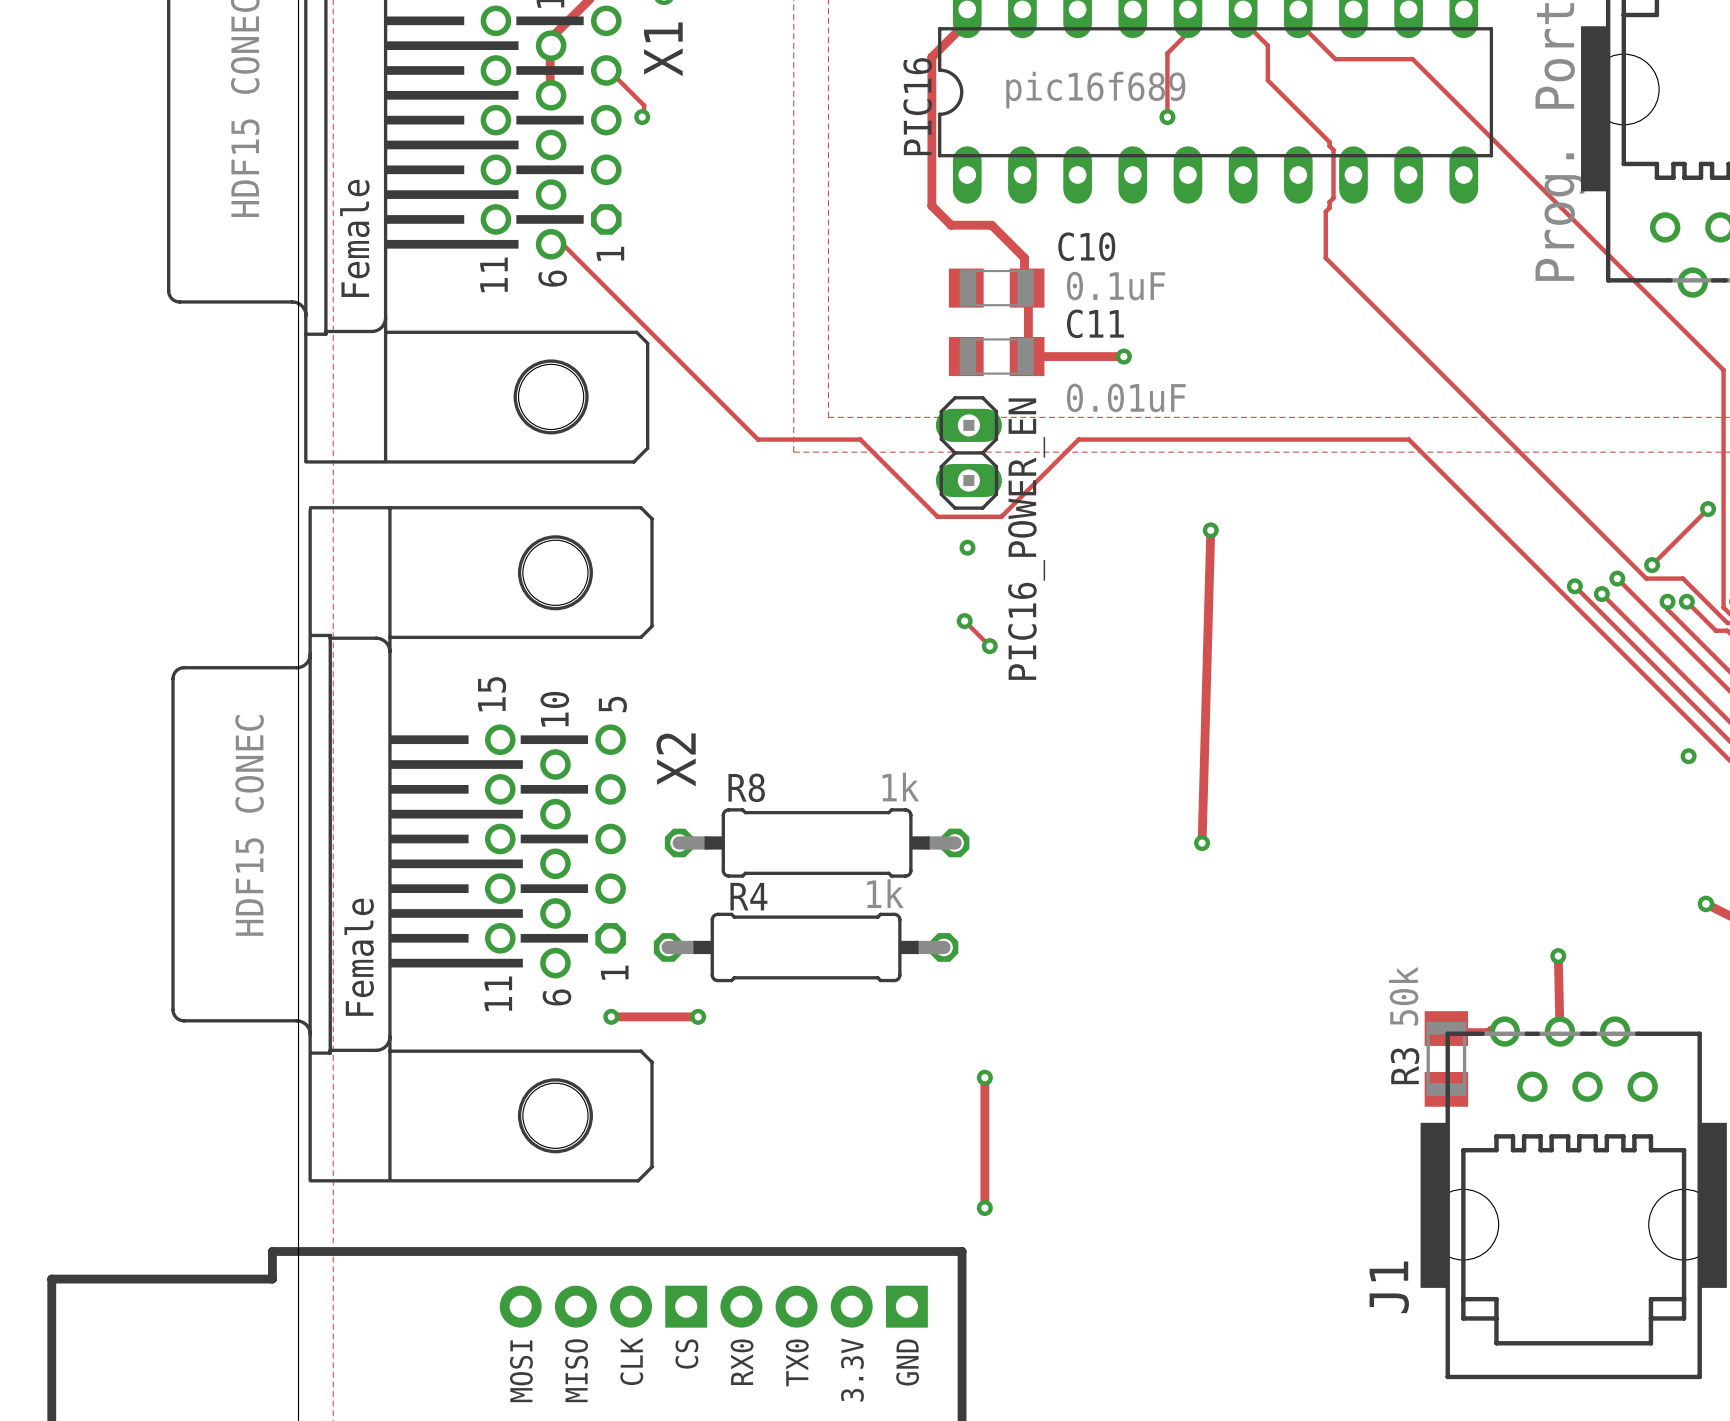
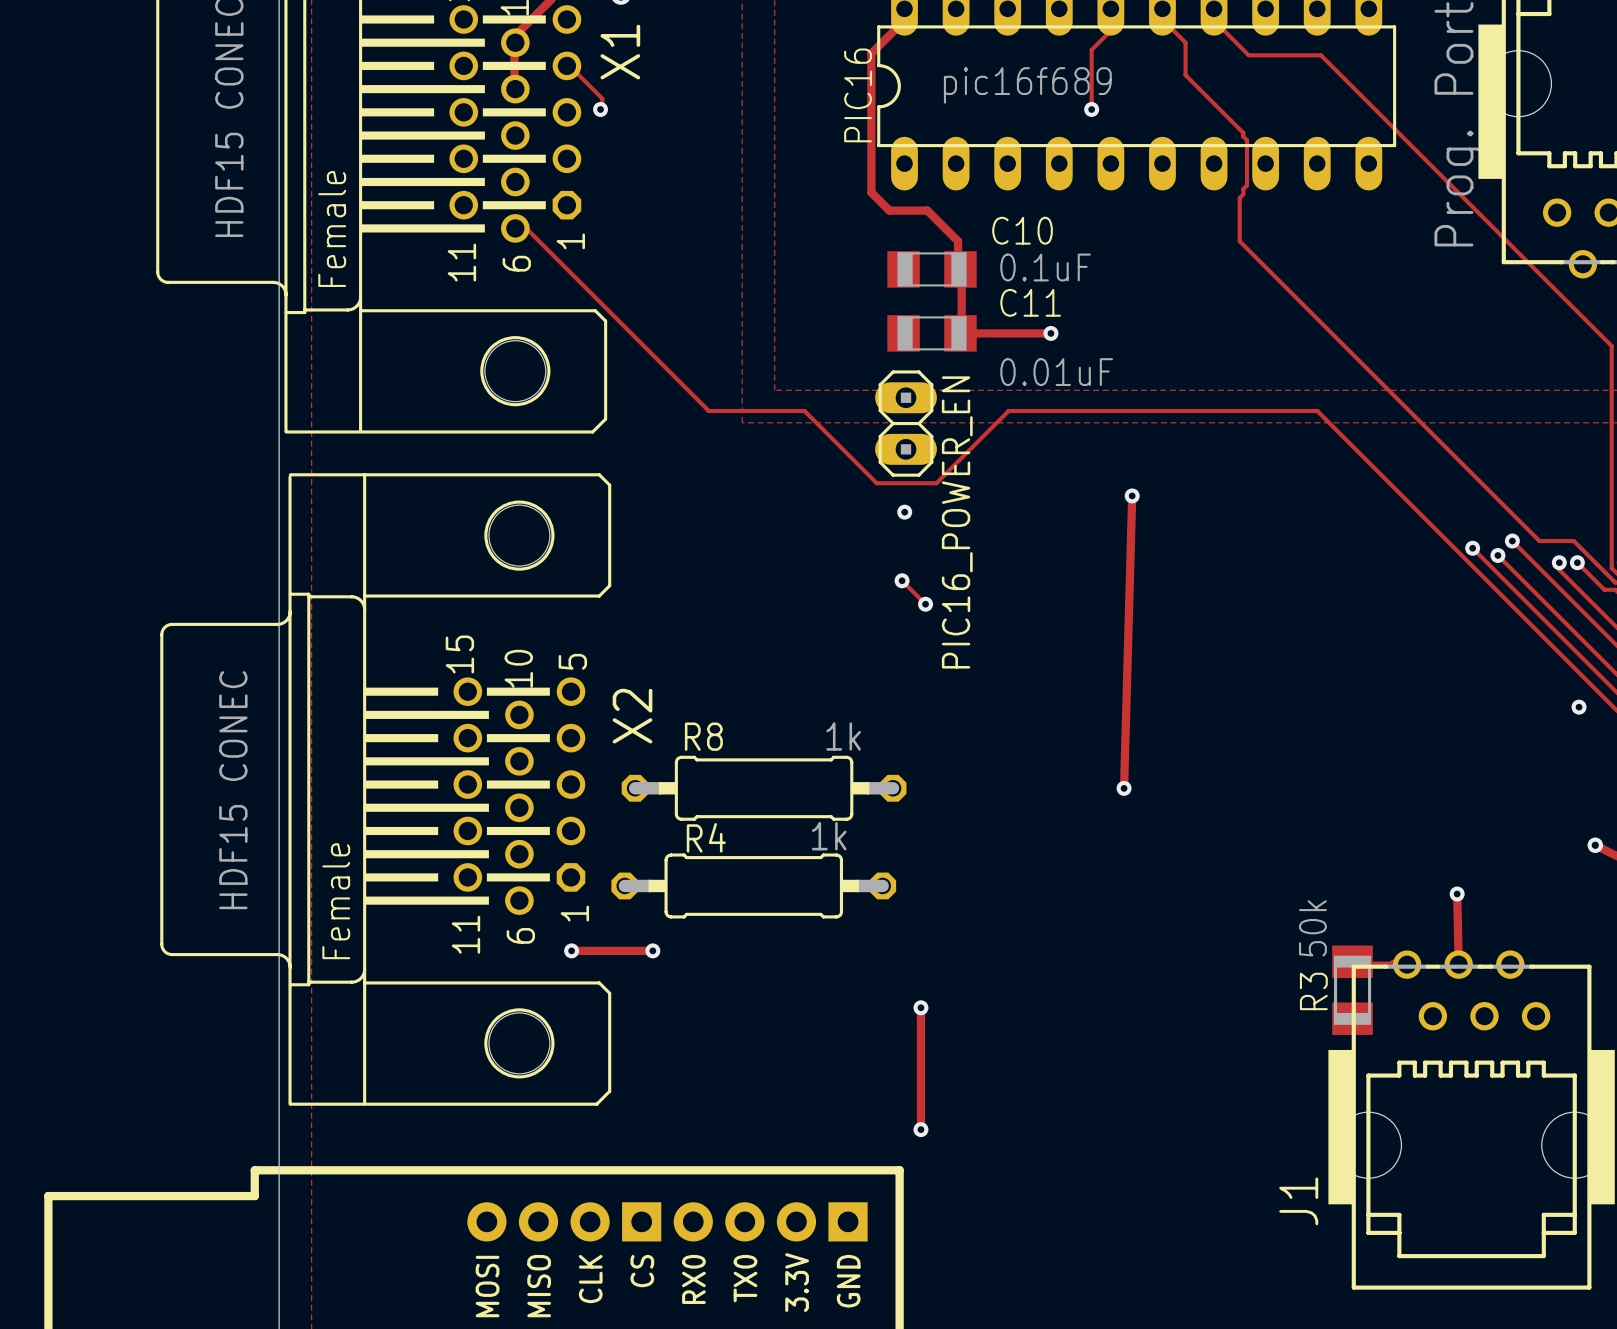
track: (1708, 509) (1652, 565) -> none
via: (1708, 509) -> none
via: (1652, 565) -> none

